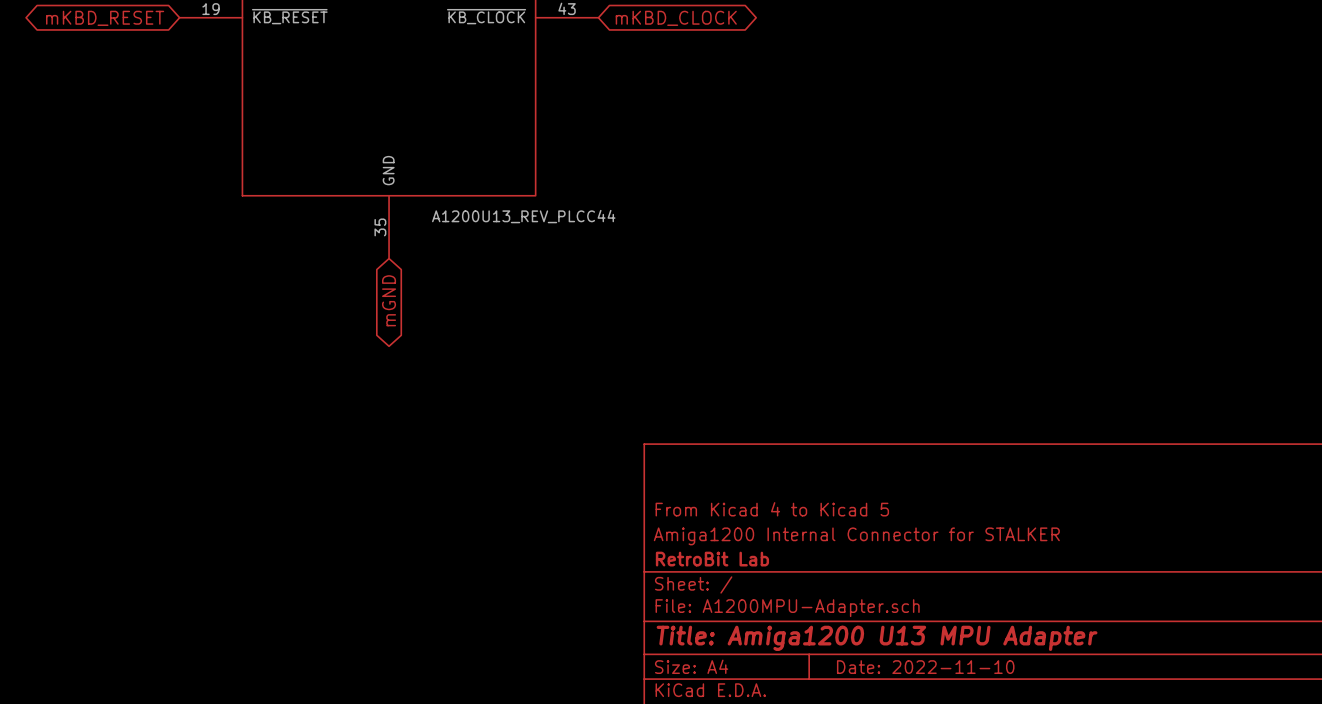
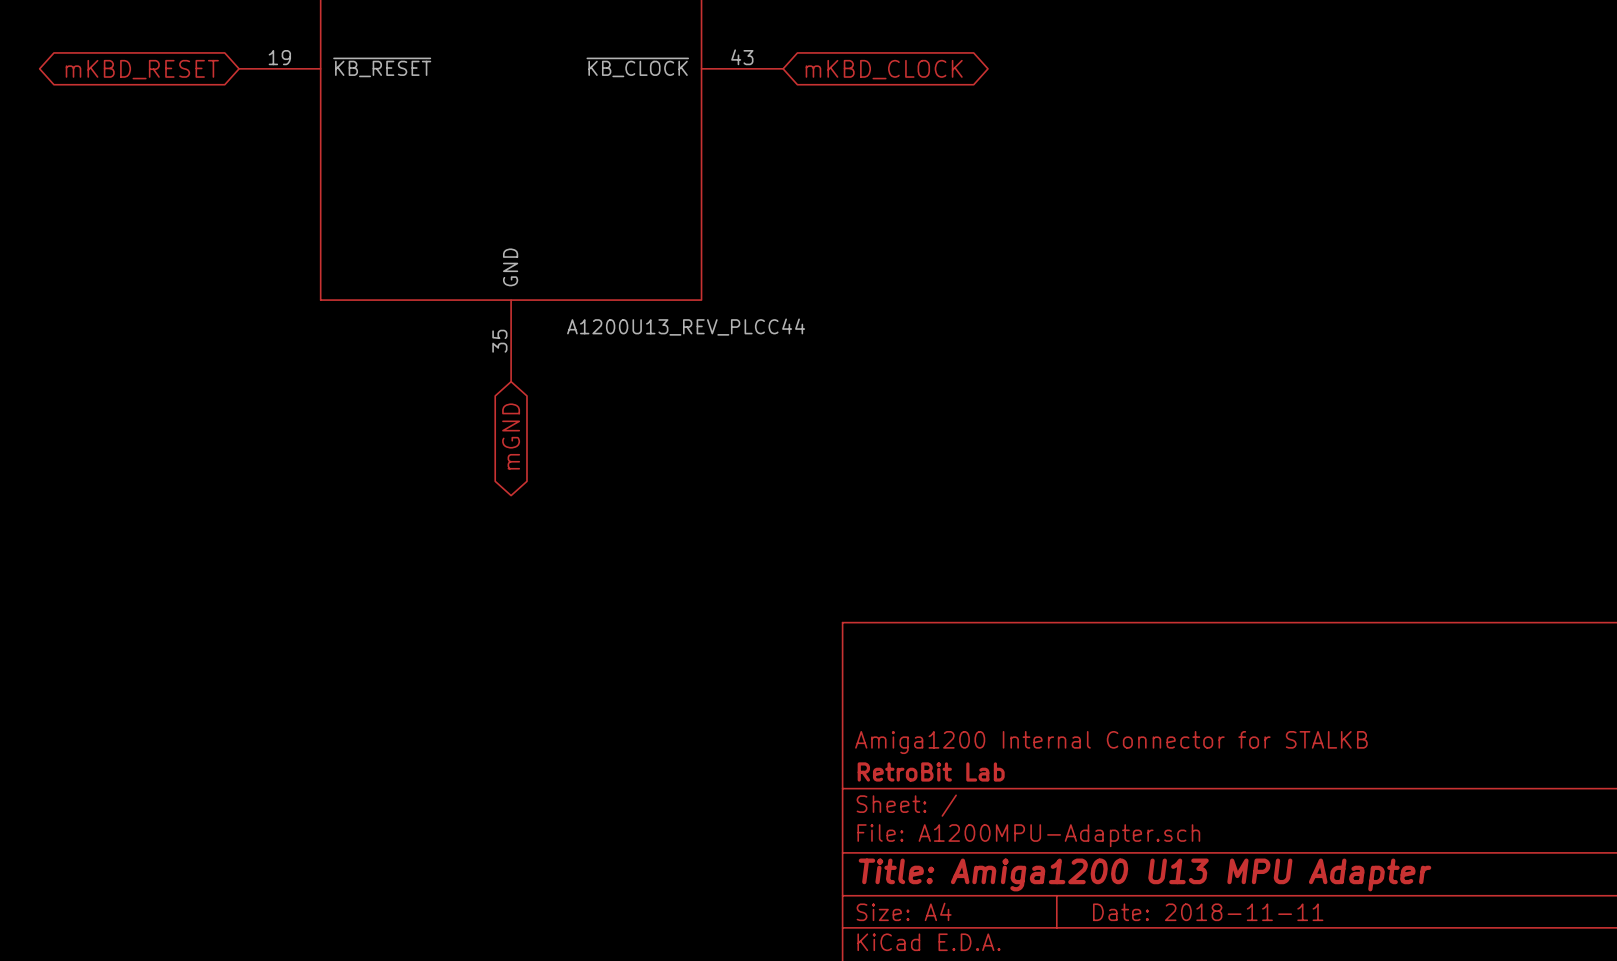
title block: From Kicad 4 to Kicad 5 (772, 509) -> none
title block: Amiga1200 Internal Connector for STALKER (856, 536) -> Amiga1200 Internal Connector for STALKB (1111, 742)
title block: Date: 2022-11-10 (925, 667) -> Date: 2018-11-11 (1208, 912)

